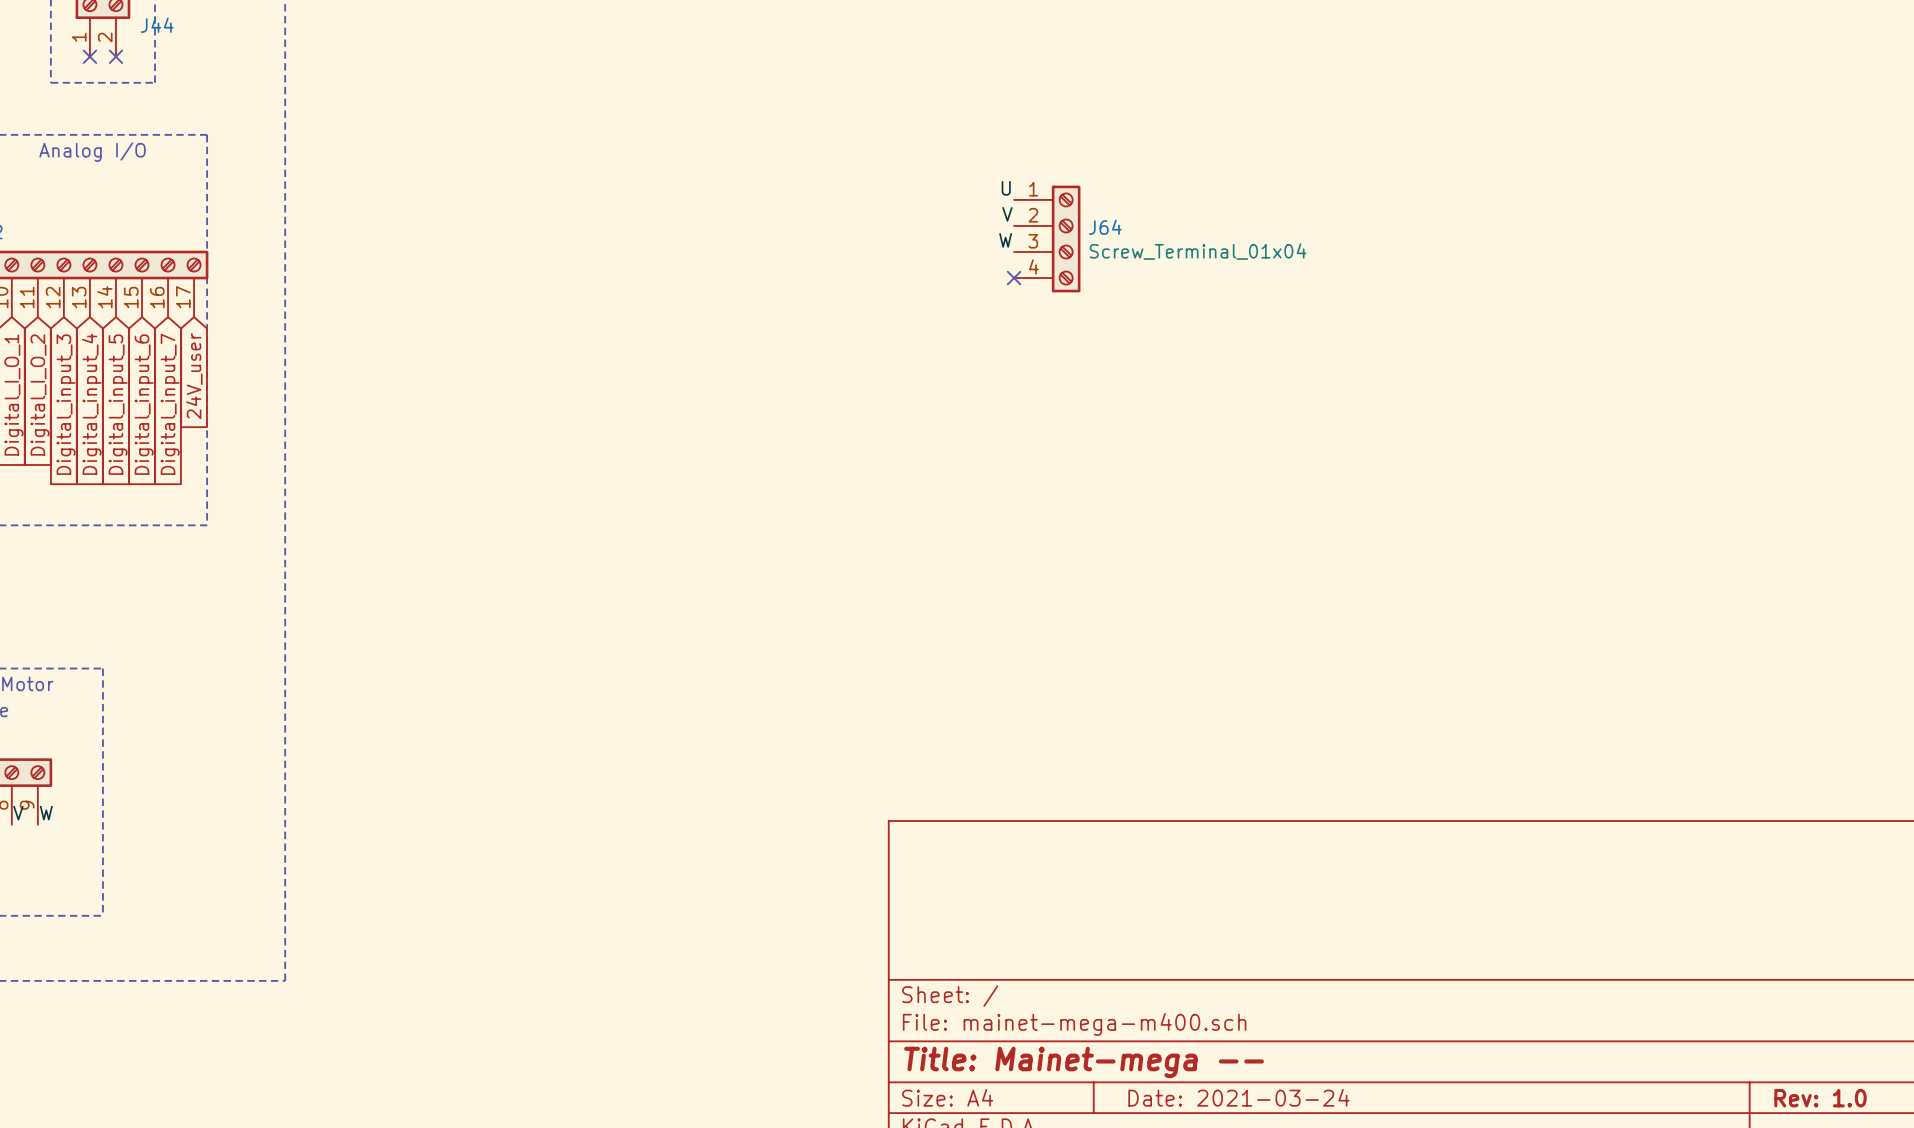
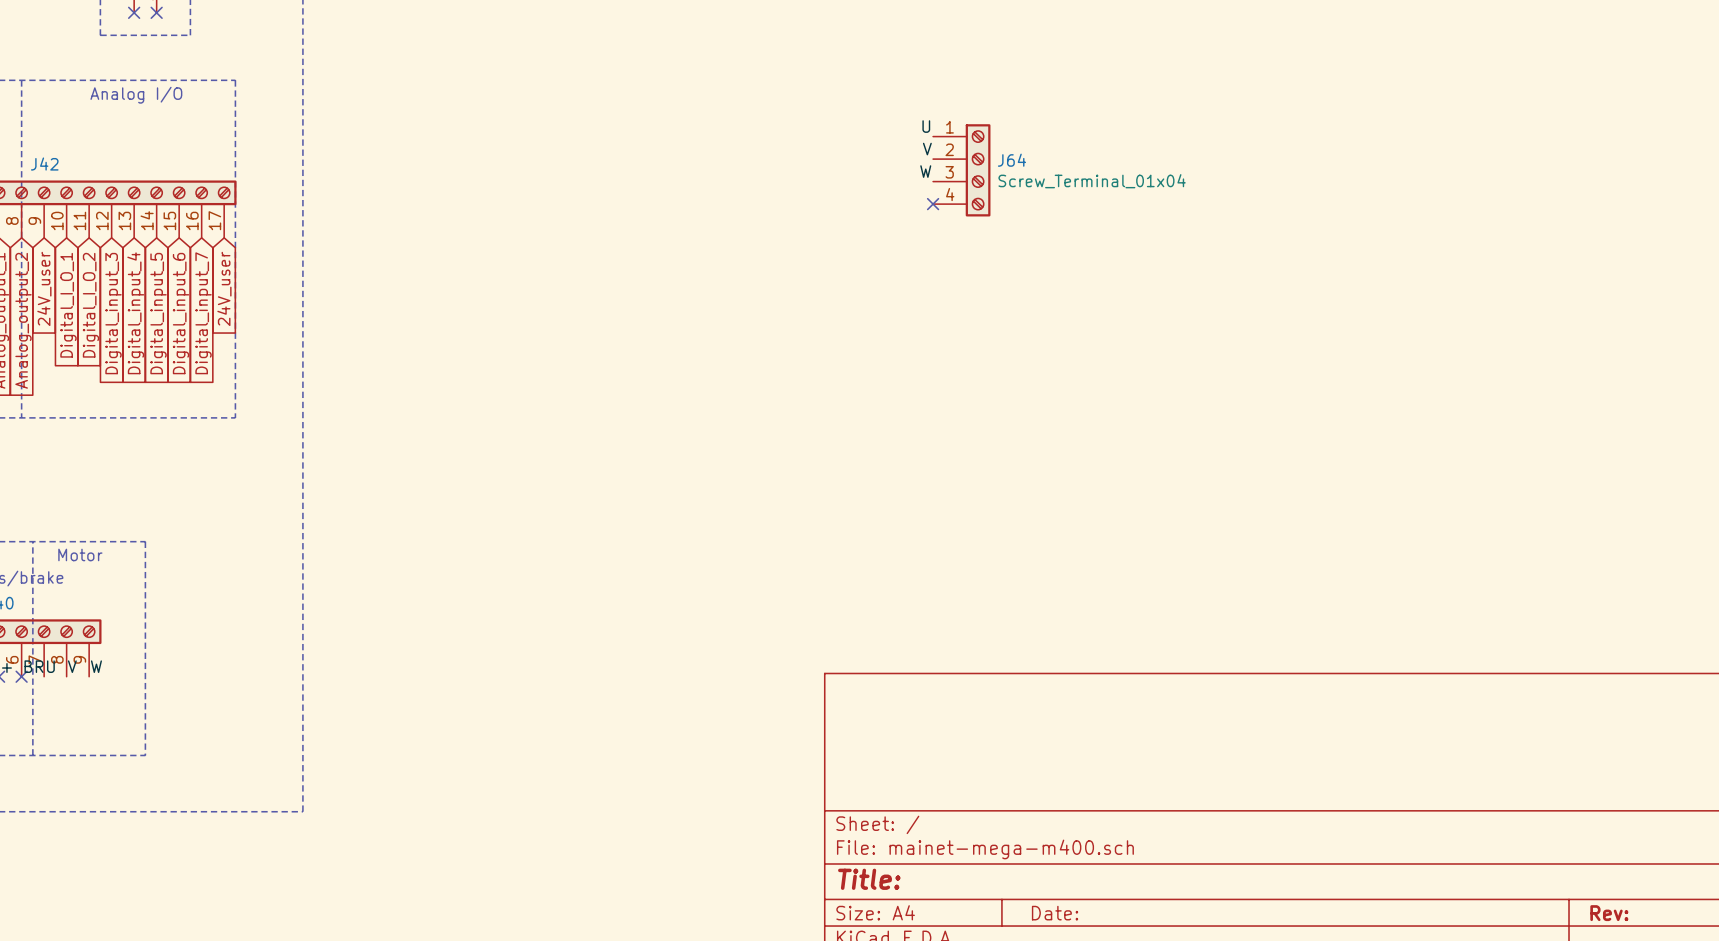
title block: Title: Mainet-mega -- (1084, 1062) -> Title: (869, 879)
title block: Date: 2021-03-24 (1238, 1097) -> Date: (1055, 913)
title block: Rev: 1.0 (1820, 1098) -> Rev: (1609, 913)

